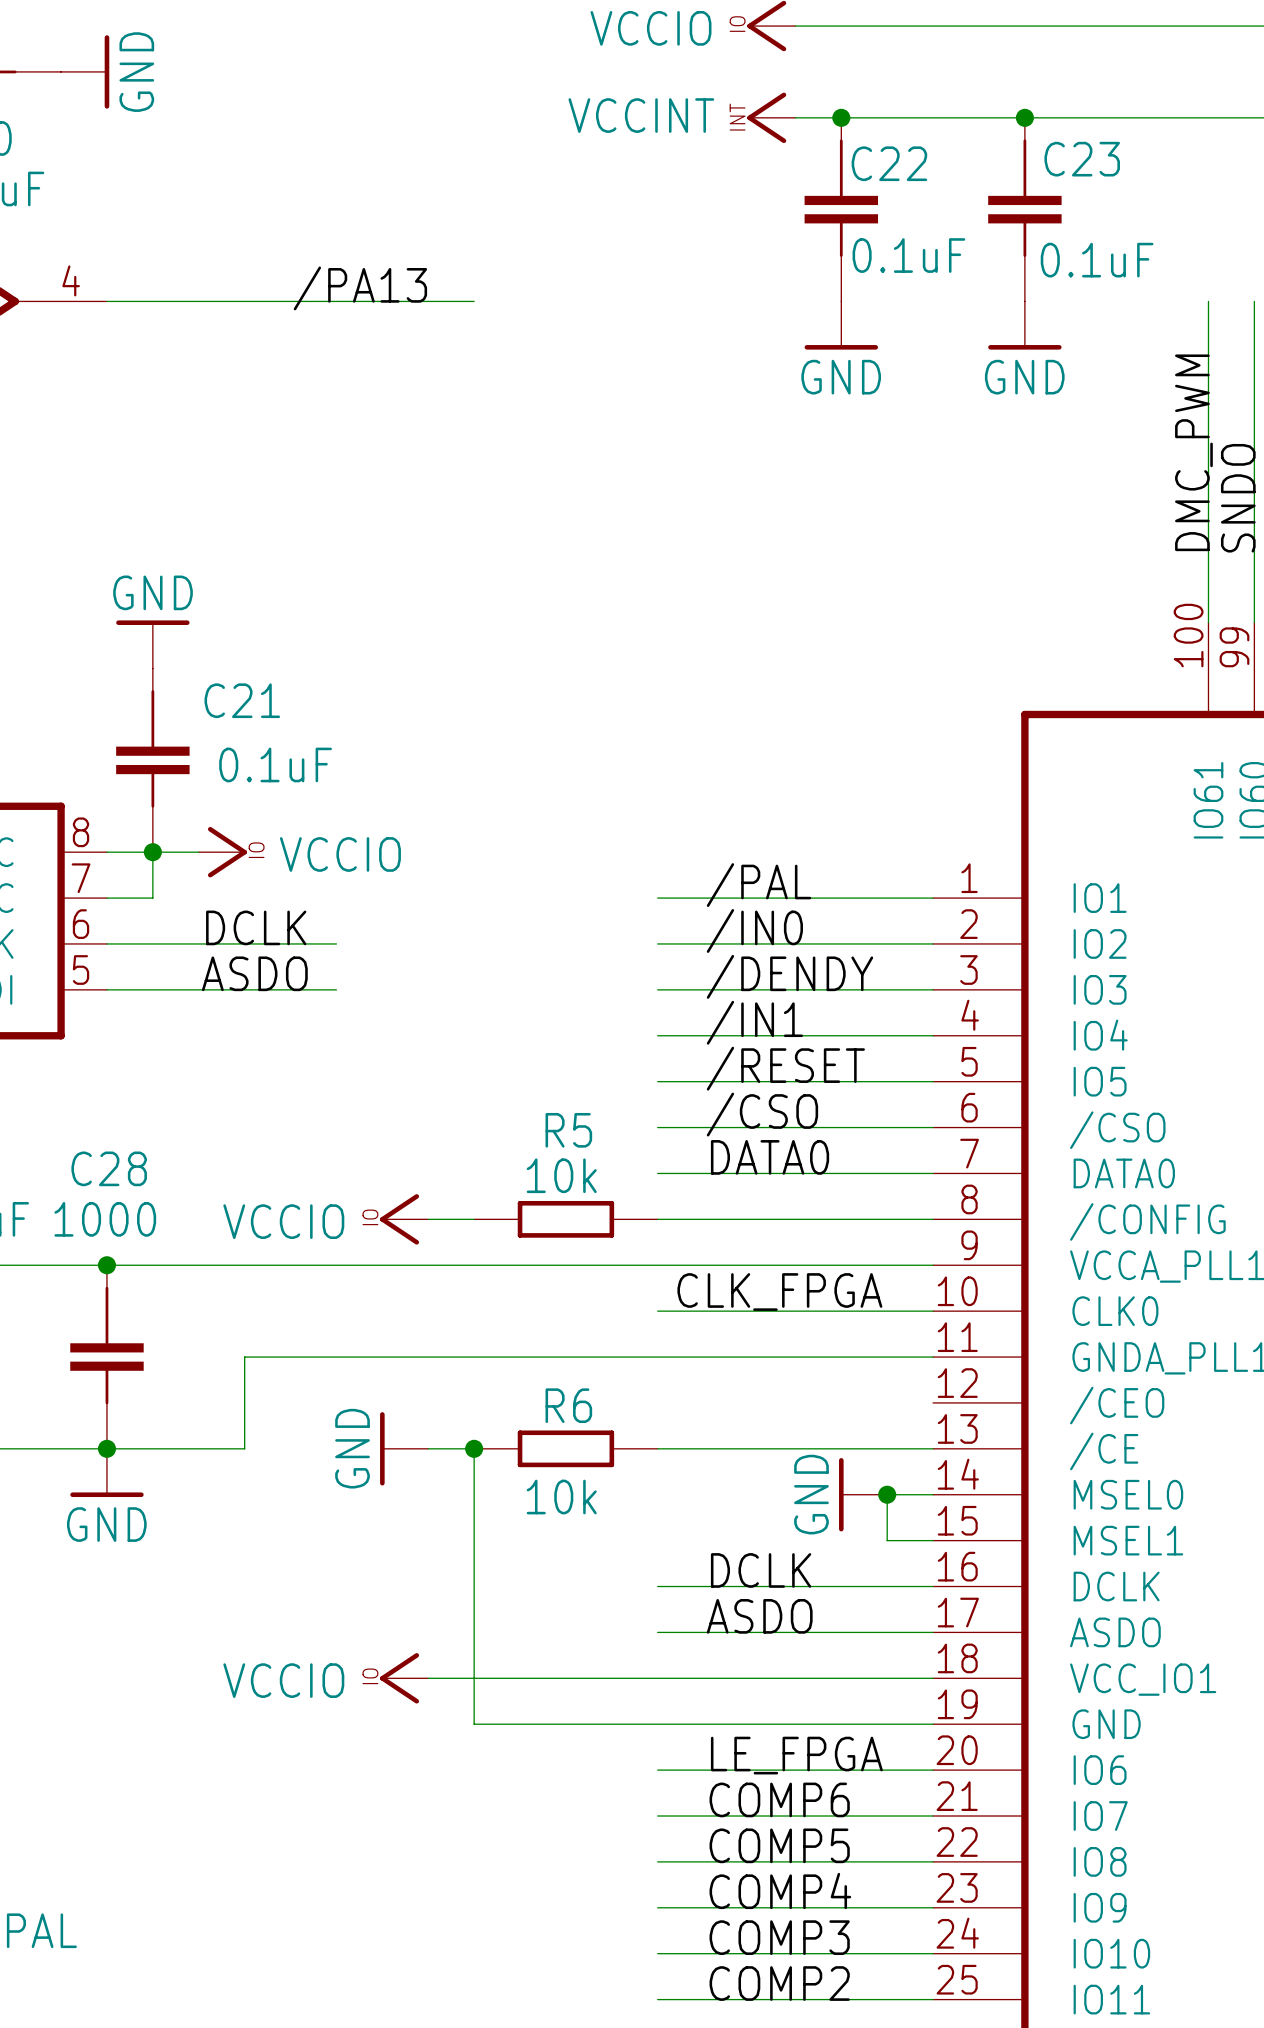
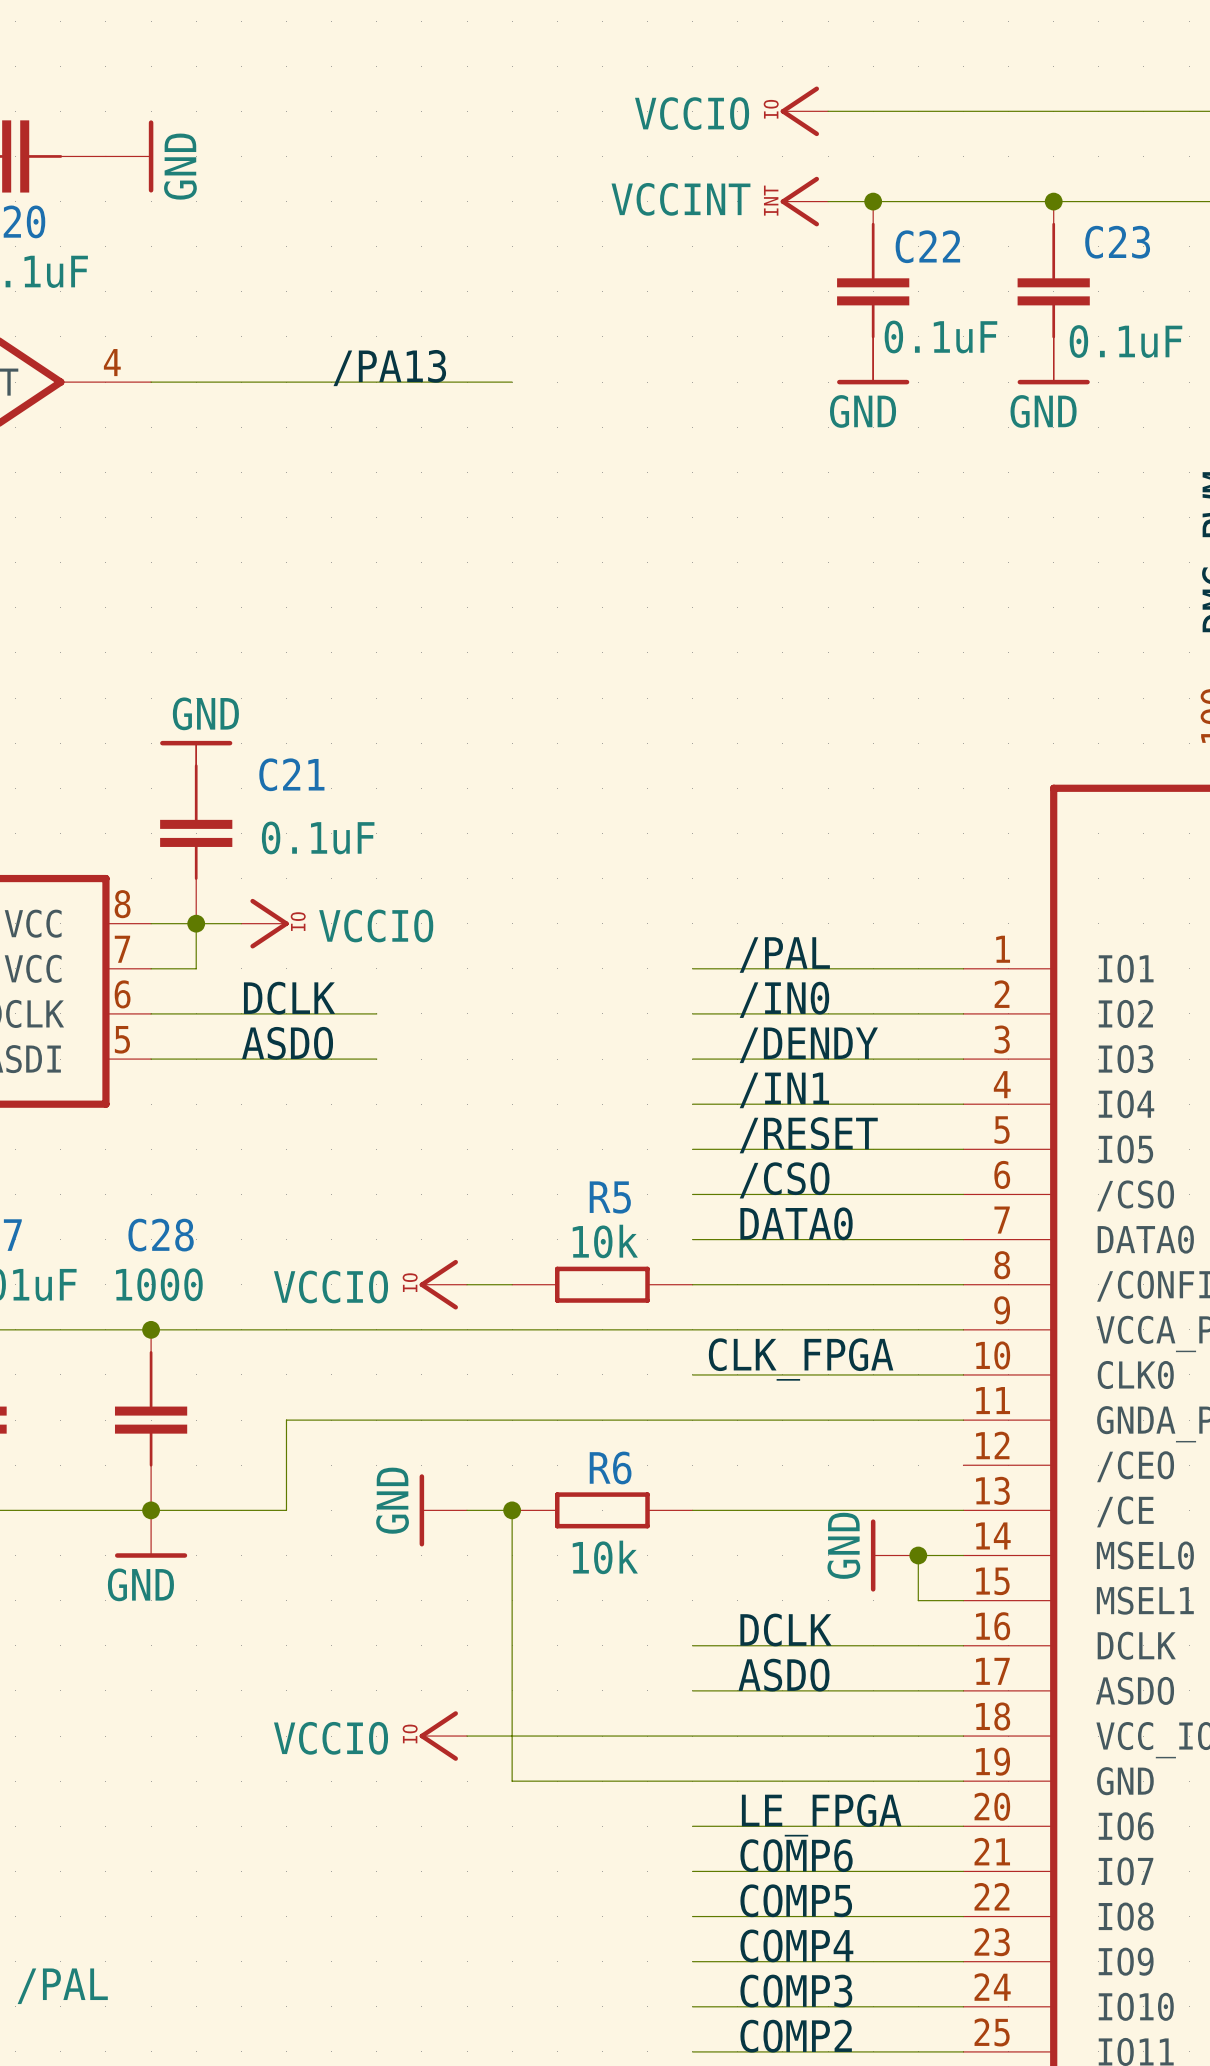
power symbol position: GND (841, 325) -> GND (873, 360)
power symbol position: GND (1024, 325) -> GND (1053, 360)
power symbol position: GND (152, 644) -> GND (196, 764)

